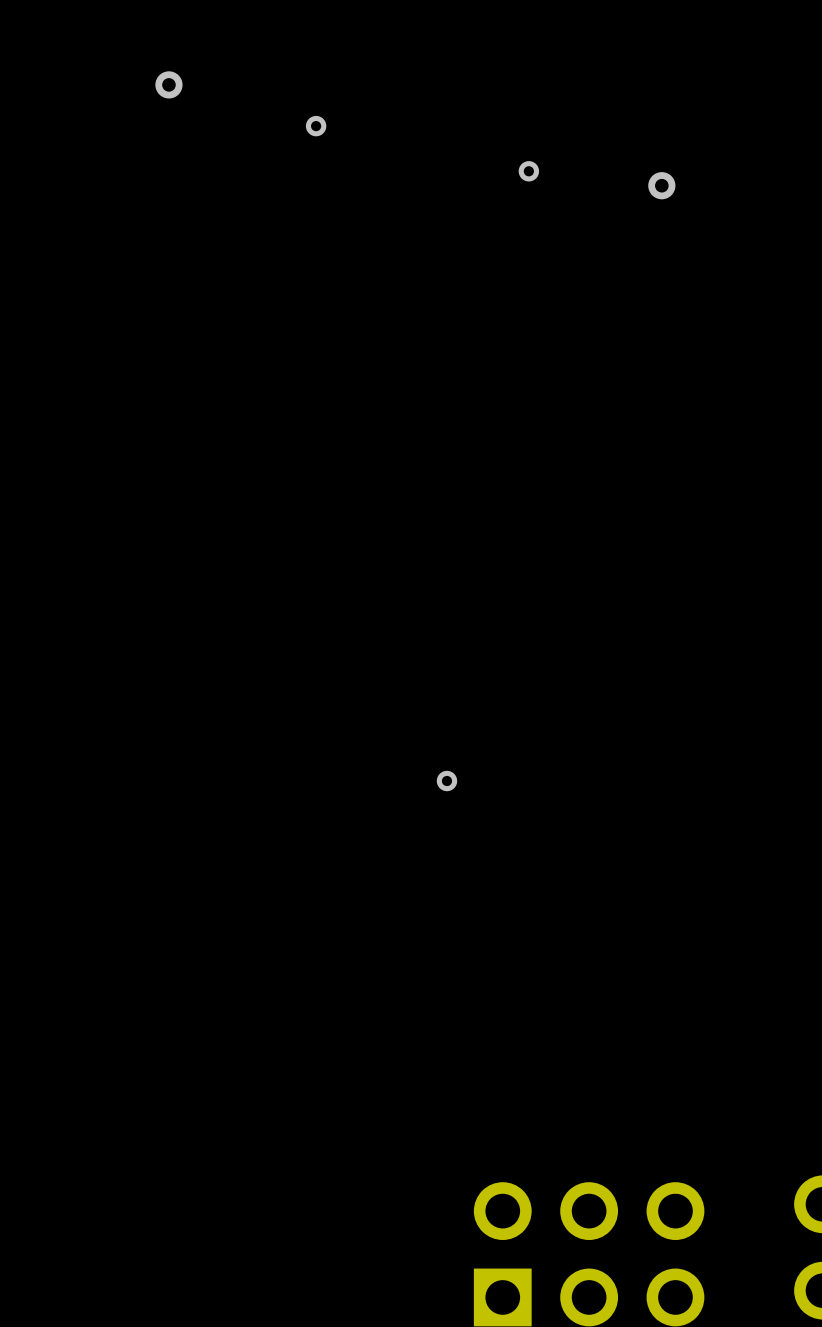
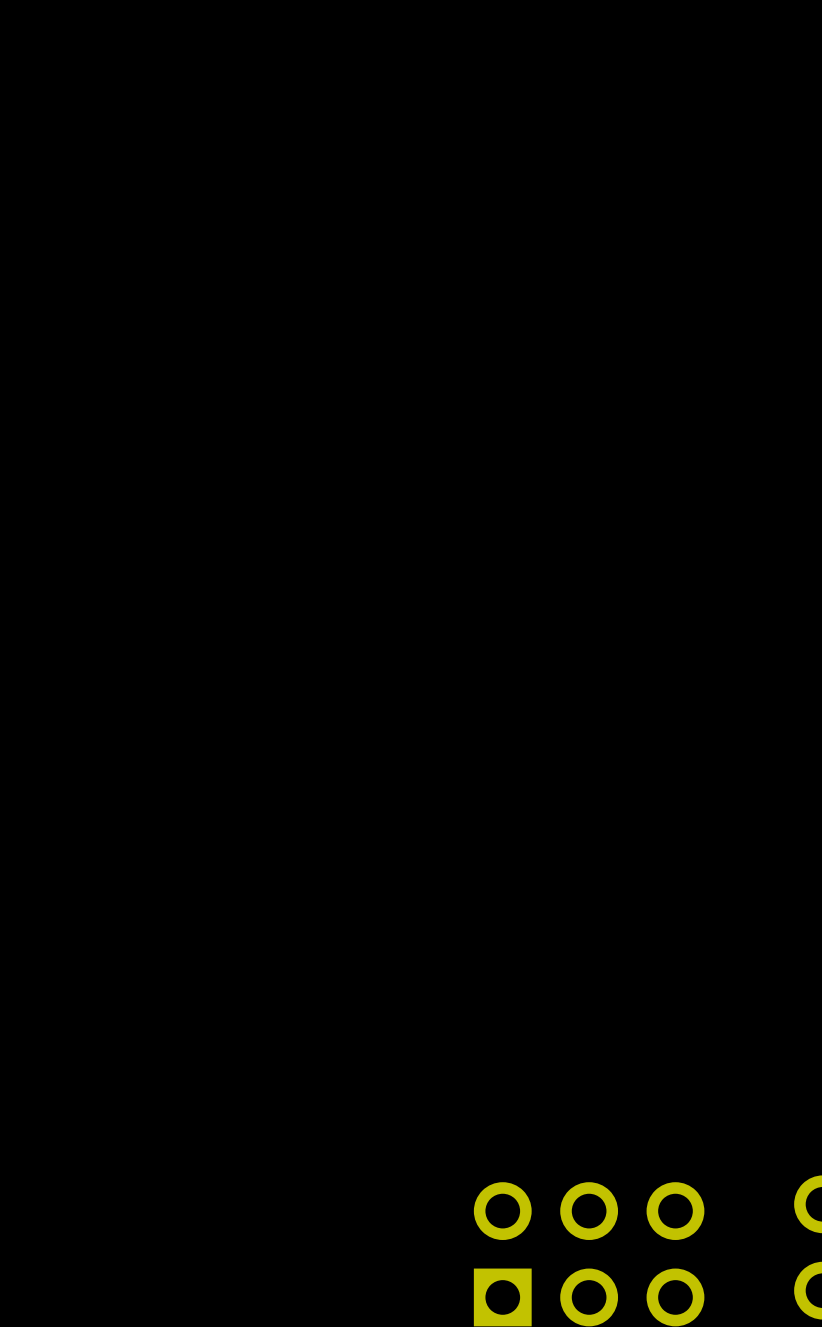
via: (168, 84) -> none
via: (316, 126) -> none
via: (528, 171) -> none
via: (661, 185) -> none
via: (446, 781) -> none

